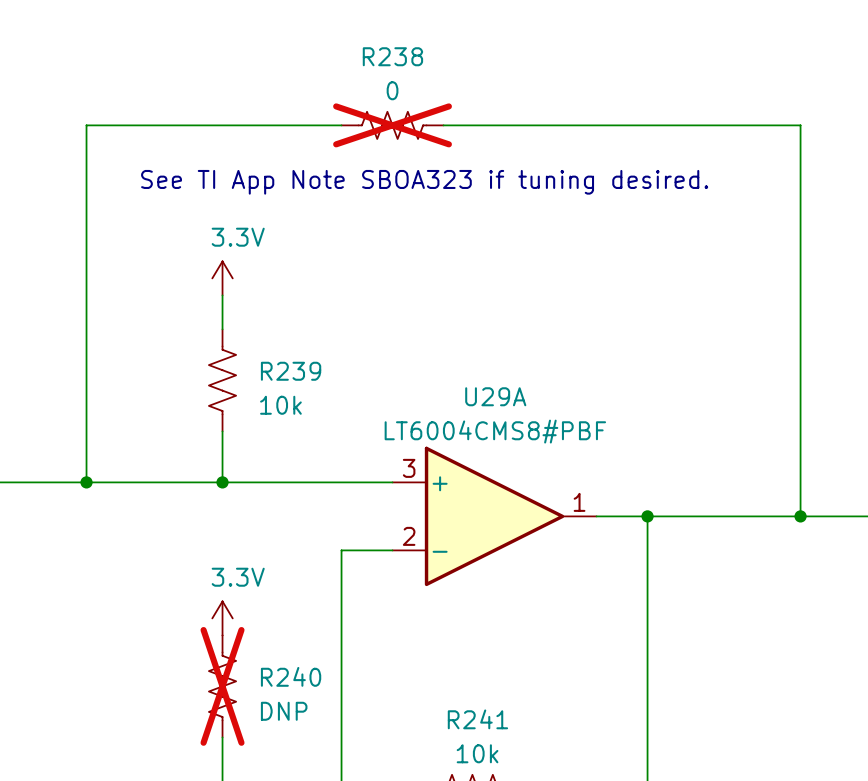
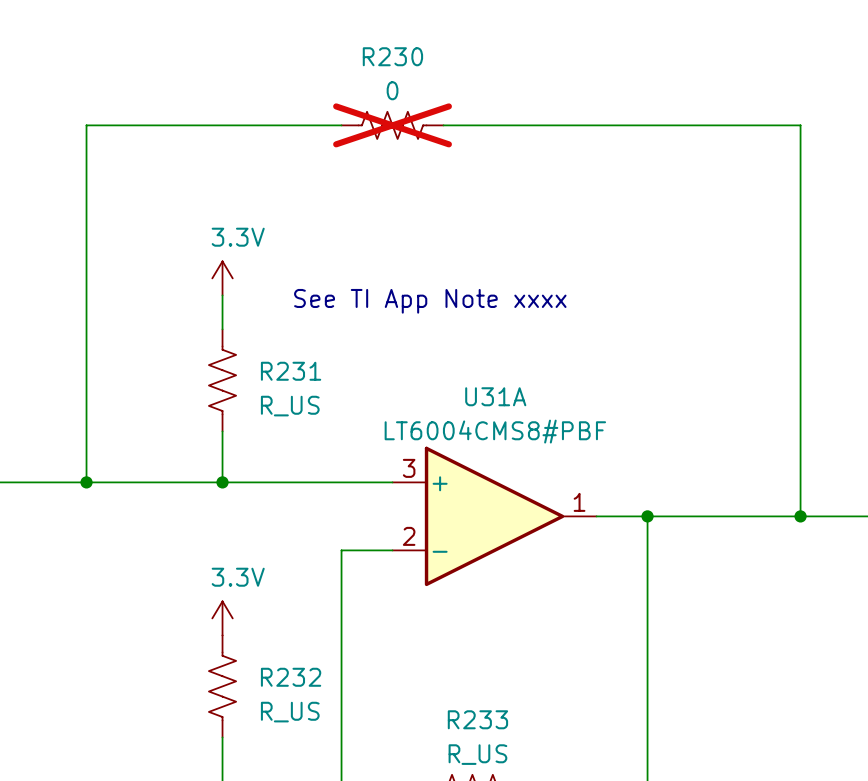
R238 name: R238 (392, 56) -> R230 (392, 56)
text: See TI App Note SBOA323 if tuning desired. (424, 182) -> none
text: none -> See TI App Note xxxx (430, 301)
R239 name: R239 (291, 371) -> R231 (291, 371)
U29A name: U29A (495, 396) -> U31A (495, 396)
R239 value: 10k (280, 405) -> R_US (290, 406)
R240 name: R240 (291, 676) -> R232 (291, 677)
R240 do-not-place cross: (222, 686) -> none
R240 value: DNP (284, 711) -> R_US (290, 712)
R241 name: R241 (477, 719) -> R233 (477, 719)
R241 value: 10k (477, 753) -> R_US (477, 754)

